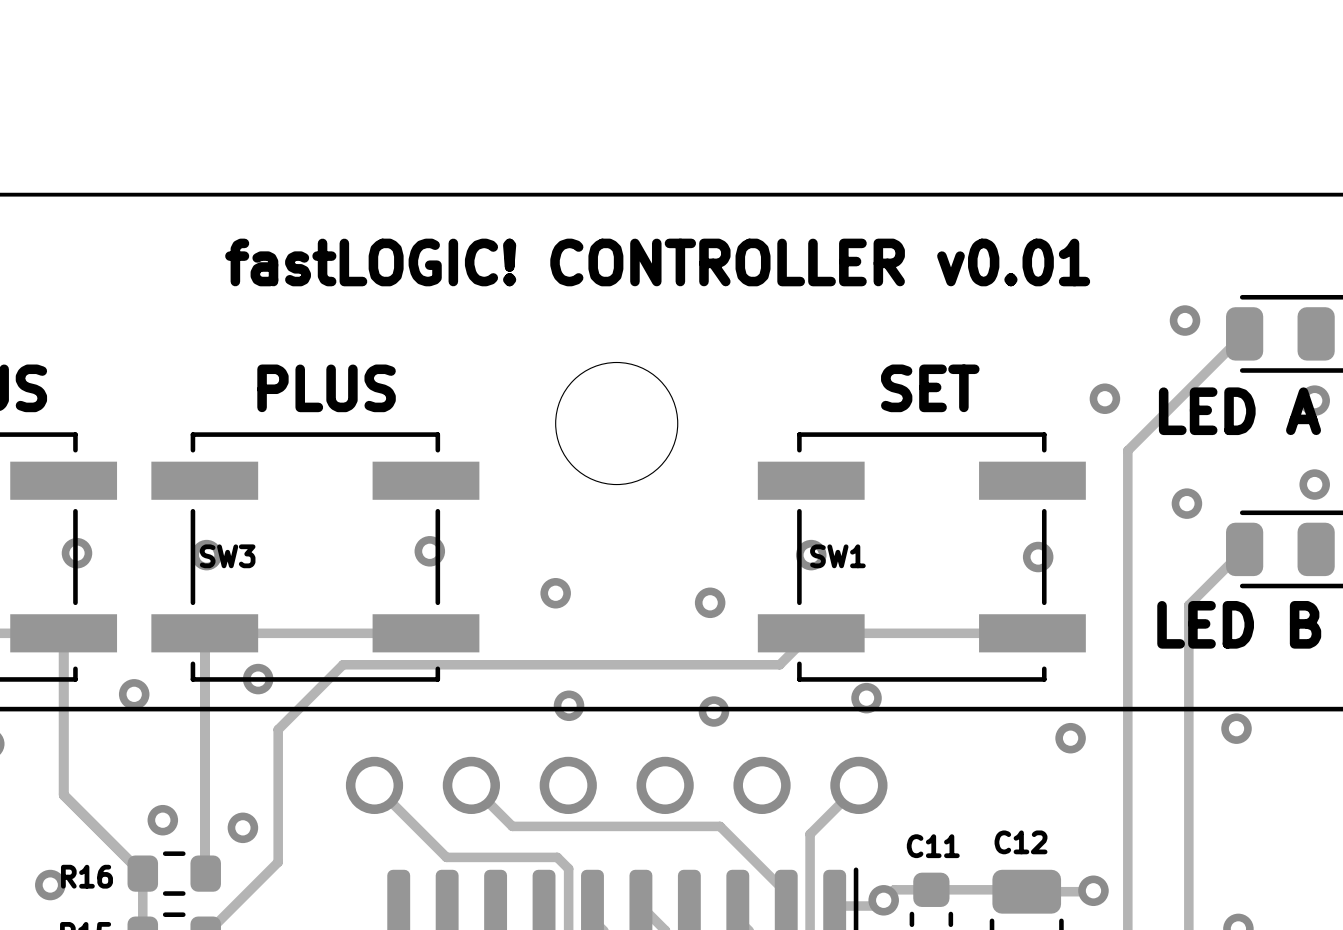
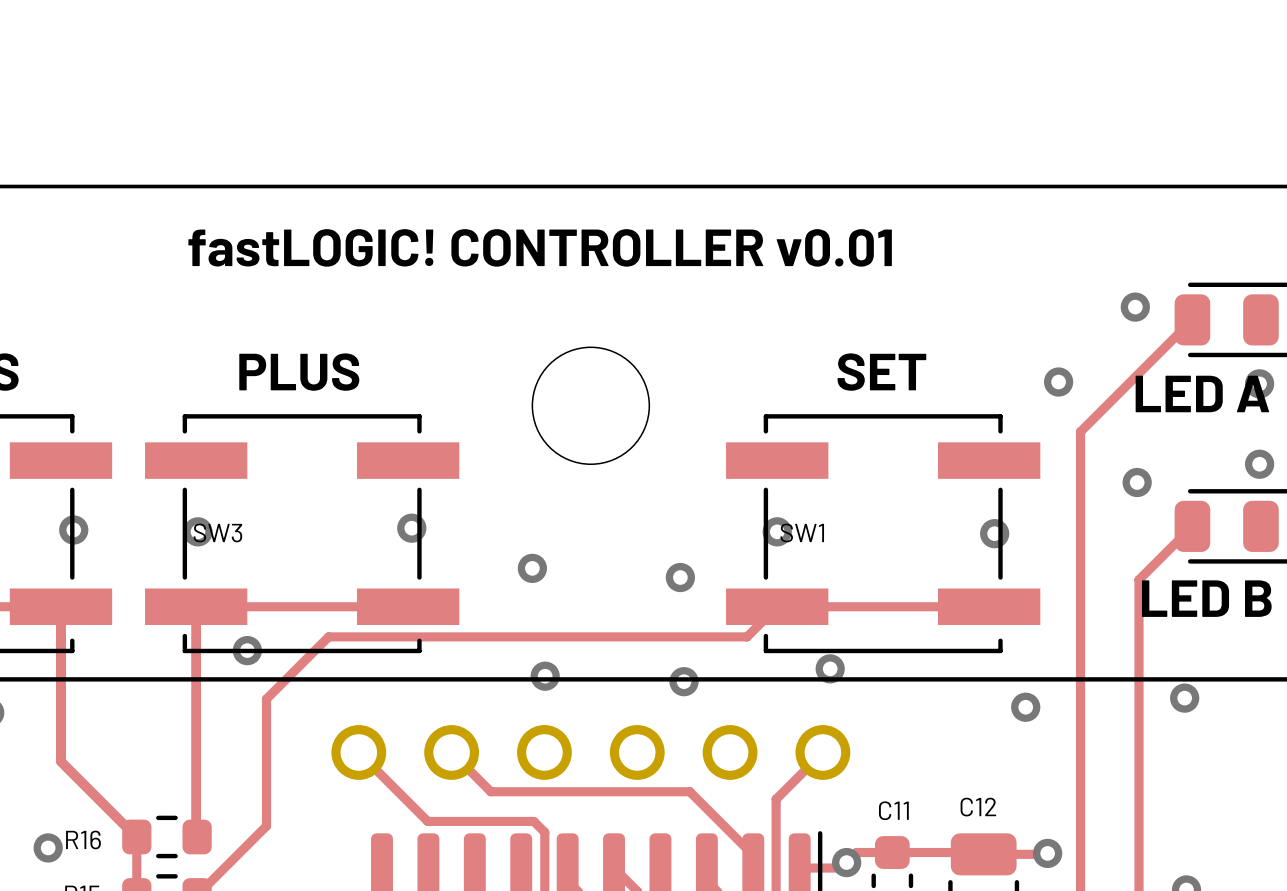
text position: fastLOGIC! CONTROLLER v0.01 (657, 262) -> fastLOGIC! CONTROLLER v0.01 (540, 247)
via: (134, 694) -> none
via: (162, 820) -> none
via: (242, 827) -> none

